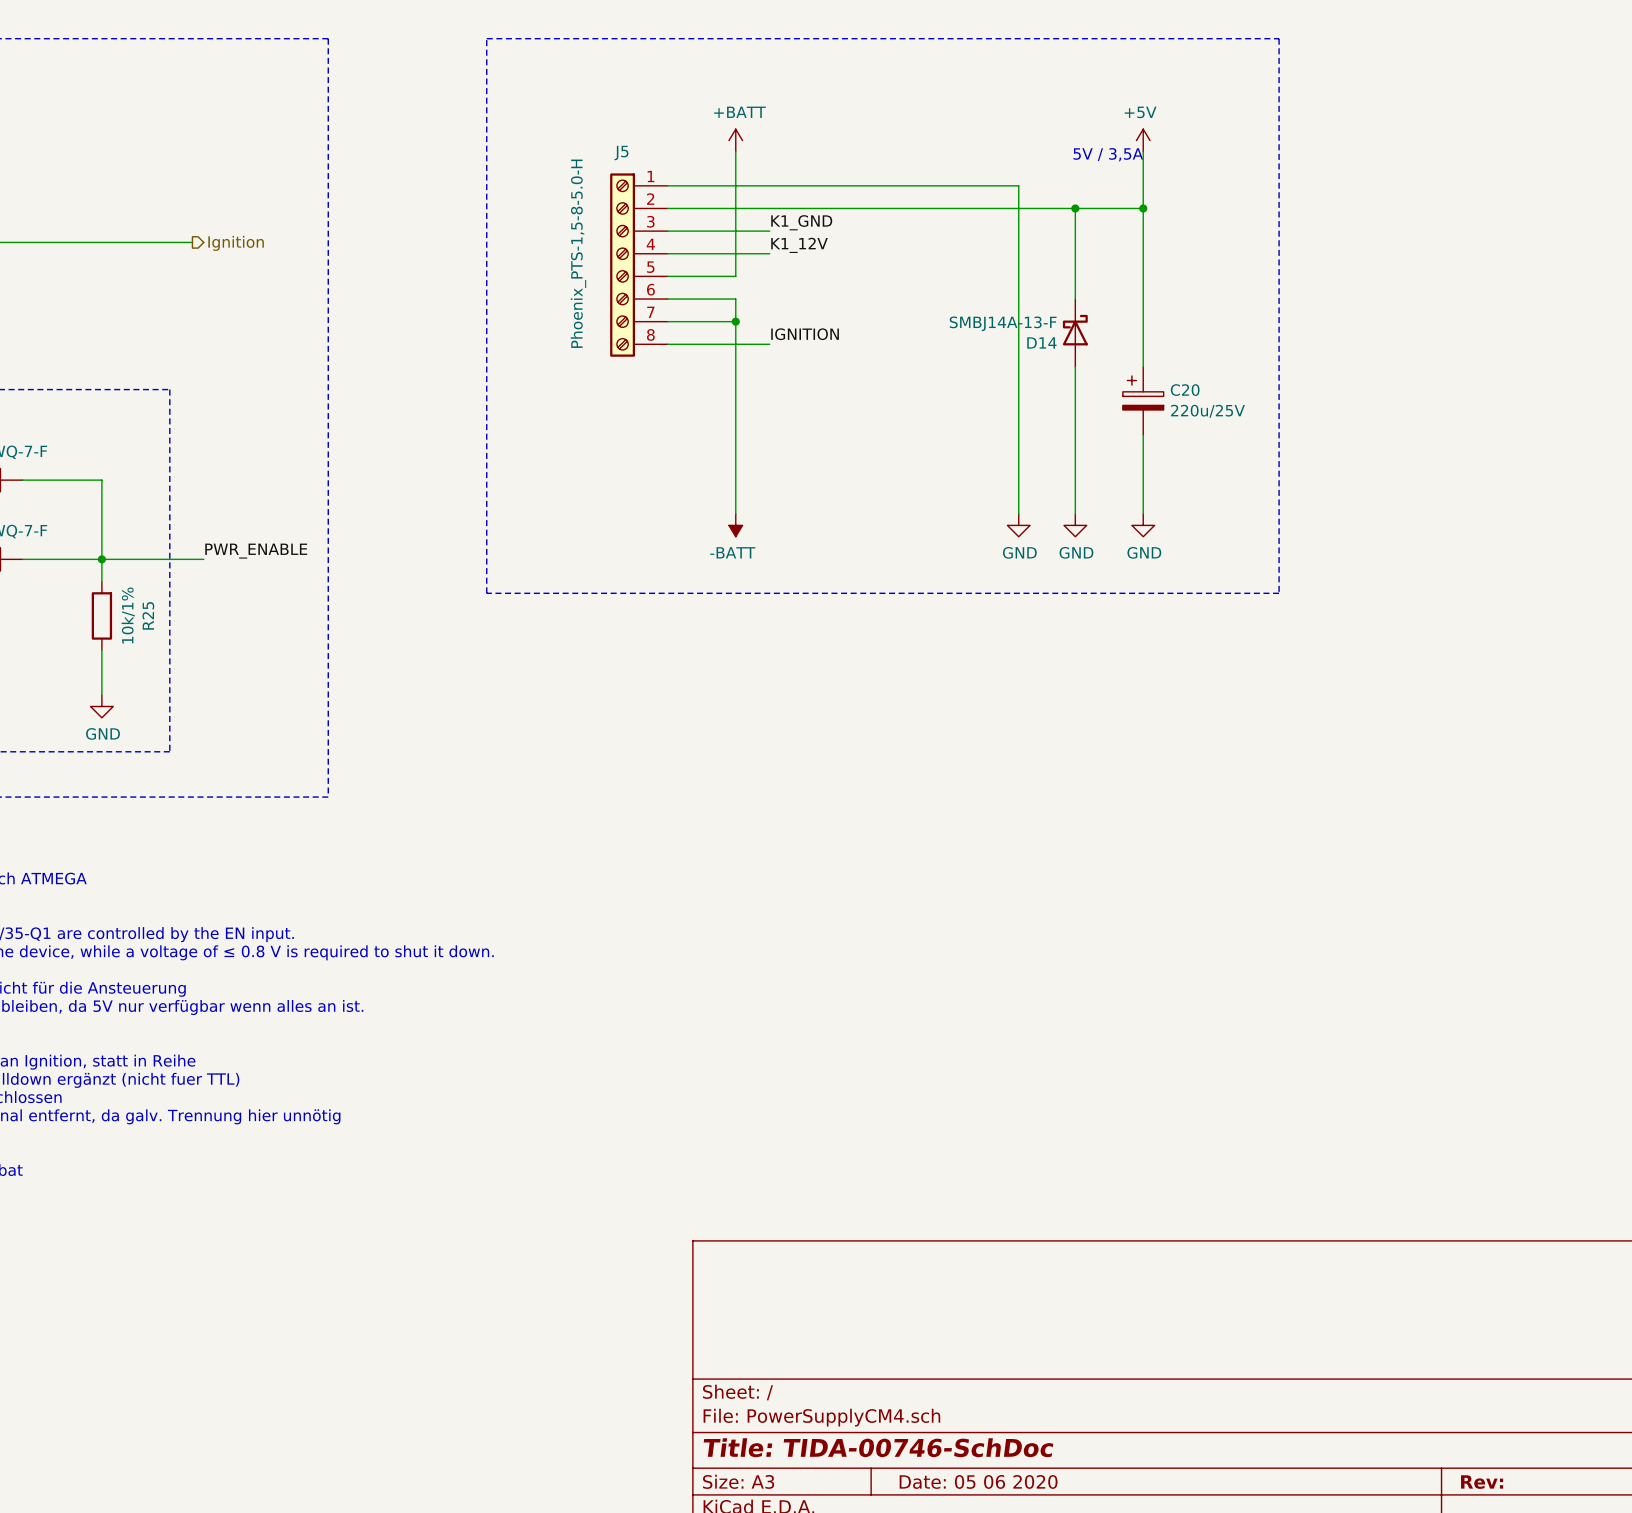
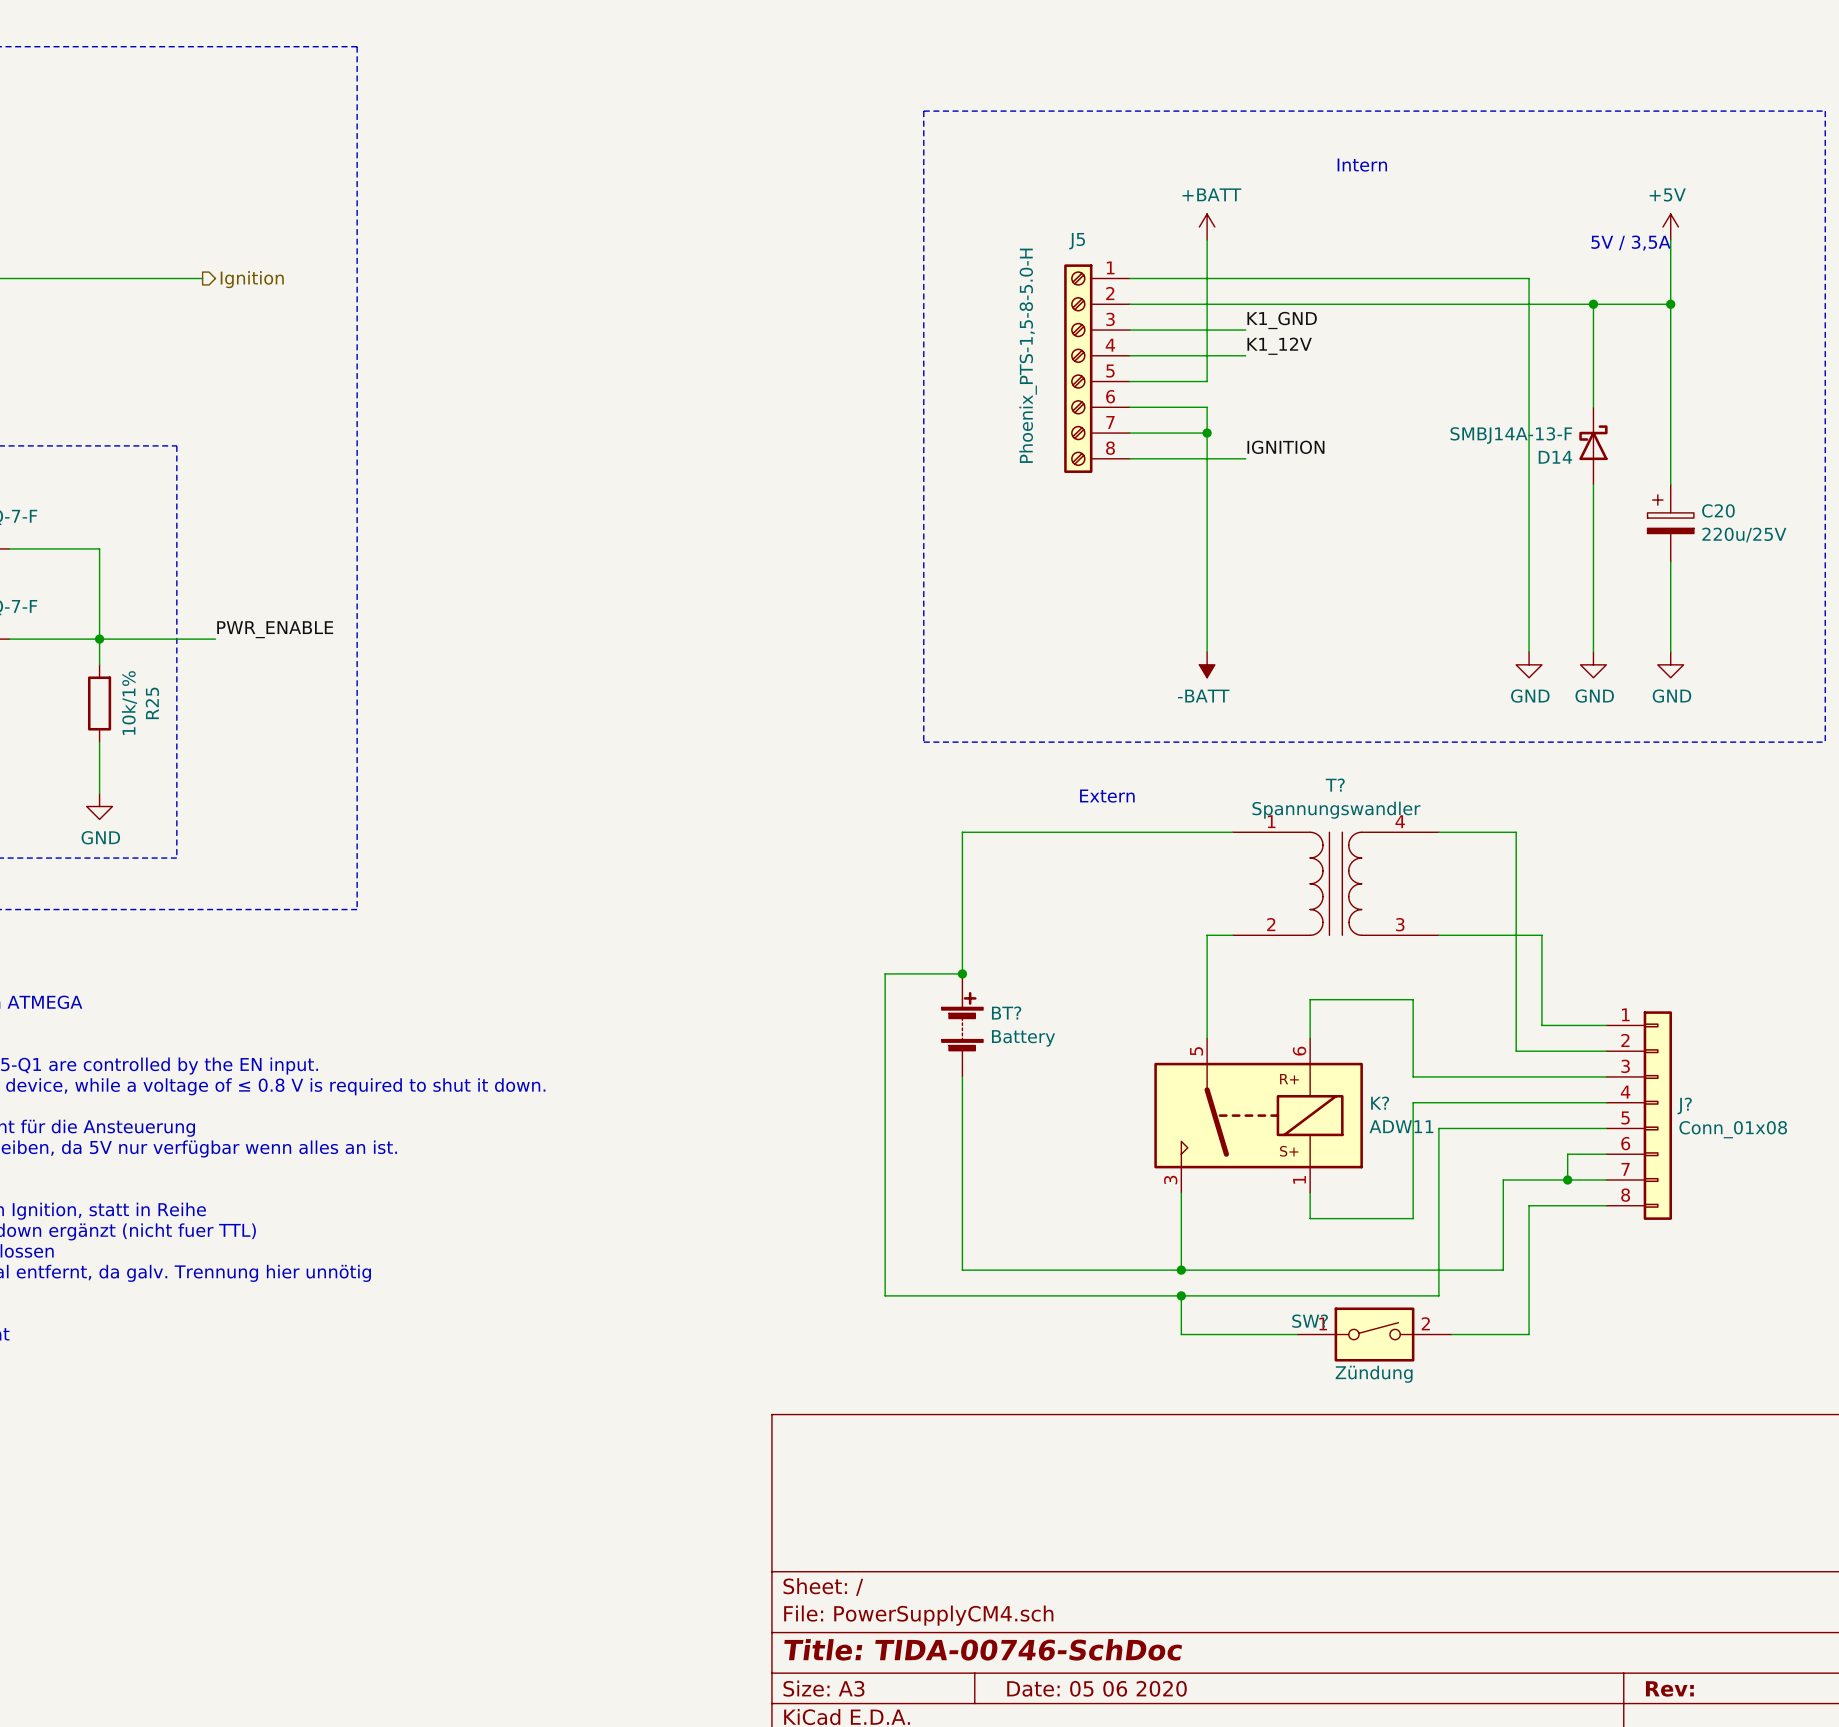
line: (486, 38) (486, 593) (1279, 593) (1279, 38) (486, 38) -> none
line: none -> (923, 111) (1825, 111) (1825, 742) (923, 742) (923, 111)
power symbol: +BATT (735, 140) -> none
power symbol: +5V (1143, 140) -> none
text: none -> Intern (1362, 165)
wire: (735, 151) (735, 276) (667, 276) -> none
wire: (1143, 151) (1143, 366) -> none
text: 5V / 3,5A (1108, 154) -> none
wire: (667, 185) (1018, 185) (1018, 514) -> none
power symbol: none -> +BATT (1207, 227)
power symbol: none -> +5V (1670, 227)
wire: (667, 208) (1143, 208) -> none
junction: (1075, 208) -> none
junction: (1143, 208) -> none
wire: none -> (1670, 239) (1670, 484)
text: none -> 5V / 3,5A (1630, 243)
label: K1_GND (801, 222) -> none
wire: (667, 231) (769, 231) -> none
wire: none -> (1129, 278) (1529, 278) (1529, 651)
label: K1_12V (799, 245) -> none
wire: (667, 253) (769, 253) -> none
J5 position: (638, 265) -> (1096, 368)
wire: none -> (1129, 304) (1670, 304)
wire: none -> (1593, 304) (1593, 407)
junction: none -> (1593, 304)
junction: none -> (1670, 304)
label: none -> K1_GND (1282, 320)
wire: none -> (1129, 330) (1245, 330)
wire: (667, 299) (735, 299) (735, 514) -> none
wire: none -> (1207, 342) (1207, 381) (1129, 381)
label: none -> K1_12V (1279, 346)
wire: none -> (1129, 355) (1245, 355)
wire: (667, 321) (735, 321) -> none
junction: (735, 321) -> none
D14 position: (1075, 332) -> (1593, 445)
label: IGNITION (805, 334) -> none
wire: (667, 344) (769, 344) -> none
wire: none -> (1129, 407) (1207, 407) (1207, 420)
wire: none -> (1129, 433) (1207, 433)
junction: none -> (1207, 433)
label: none -> IGNITION (1285, 447)
wire: none -> (1129, 458) (1245, 458)
C20 position: (1143, 400) -> (1670, 523)
wire: none -> (1593, 484) (1593, 651)
wire: (1143, 434) (1143, 514) -> none
wire: none -> (1670, 561) (1670, 651)
wire: none -> (1207, 587) (1207, 651)
power symbol: -BATT (735, 525) -> none
power symbol: GND (1018, 525) -> none
power symbol: GND (1075, 525) -> none
power symbol: GND (1143, 525) -> none
power symbol: none -> -BATT (1207, 664)
power symbol: none -> GND (1529, 664)
power symbol: none -> GND (1593, 664)
power symbol: none -> GND (1670, 664)
text: none -> Extern (1107, 796)
wire: none -> (1232, 832) (962, 832) (962, 973) (885, 973) (885, 1295) (1438, 1295) (1438, 1128) (1606, 1128)
wire: none -> (1438, 832) (1516, 832) (1516, 1051) (1606, 1051)
T?: none -> Spannungswandler (1335, 883)
wire: none -> (1232, 935) (1207, 935) (1207, 1038)
wire: none -> (1438, 935) (1541, 935) (1541, 1025) (1606, 1025)
junction: none -> (962, 973)
BT?: none -> Battery (962, 1025)
wire: none -> (1310, 1038) (1310, 999) (1413, 999) (1413, 1076) (1606, 1076)
wire: none -> (962, 1076) (962, 1270) (1503, 1270) (1503, 1179) (1606, 1179)
wire: none -> (1606, 1102) (1413, 1102) (1413, 1218) (1310, 1218) (1310, 1192)
K?: none -> ADW11 (1258, 1115)
J?: none -> Conn_01x08 (1639, 1115)
wire: none -> (1606, 1154) (1567, 1154) (1567, 1179)
junction: none -> (1567, 1179)
wire: none -> (1181, 1192) (1181, 1270)
wire: none -> (1606, 1205) (1529, 1205) (1529, 1334) (1451, 1334)
junction: none -> (1181, 1270)
wire: none -> (1181, 1295) (1181, 1334) (1297, 1334)
junction: none -> (1181, 1295)
SW?: none -> Zündung (1374, 1334)

